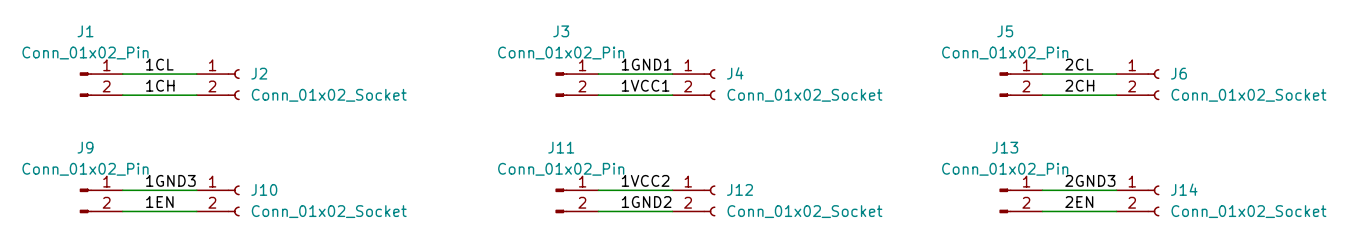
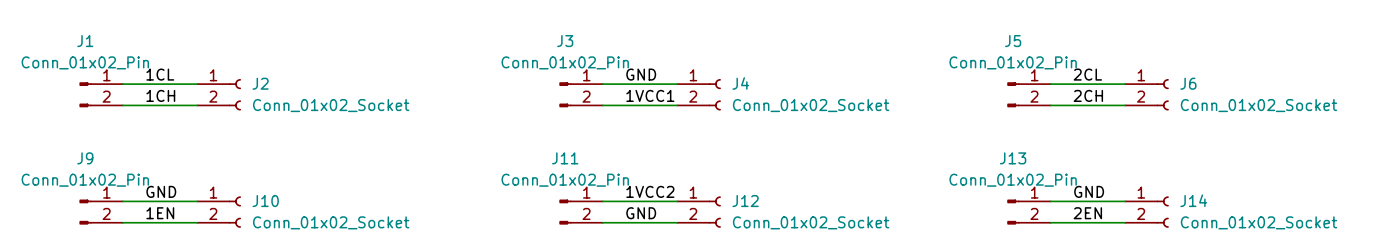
label: 1GND1 (646, 64) -> GND (641, 74)
label: 1GND3 (170, 180) -> GND (161, 191)
label: 2GND3 (1090, 180) -> GND (1089, 191)
label: 1GND2 (646, 202) -> GND (641, 213)

